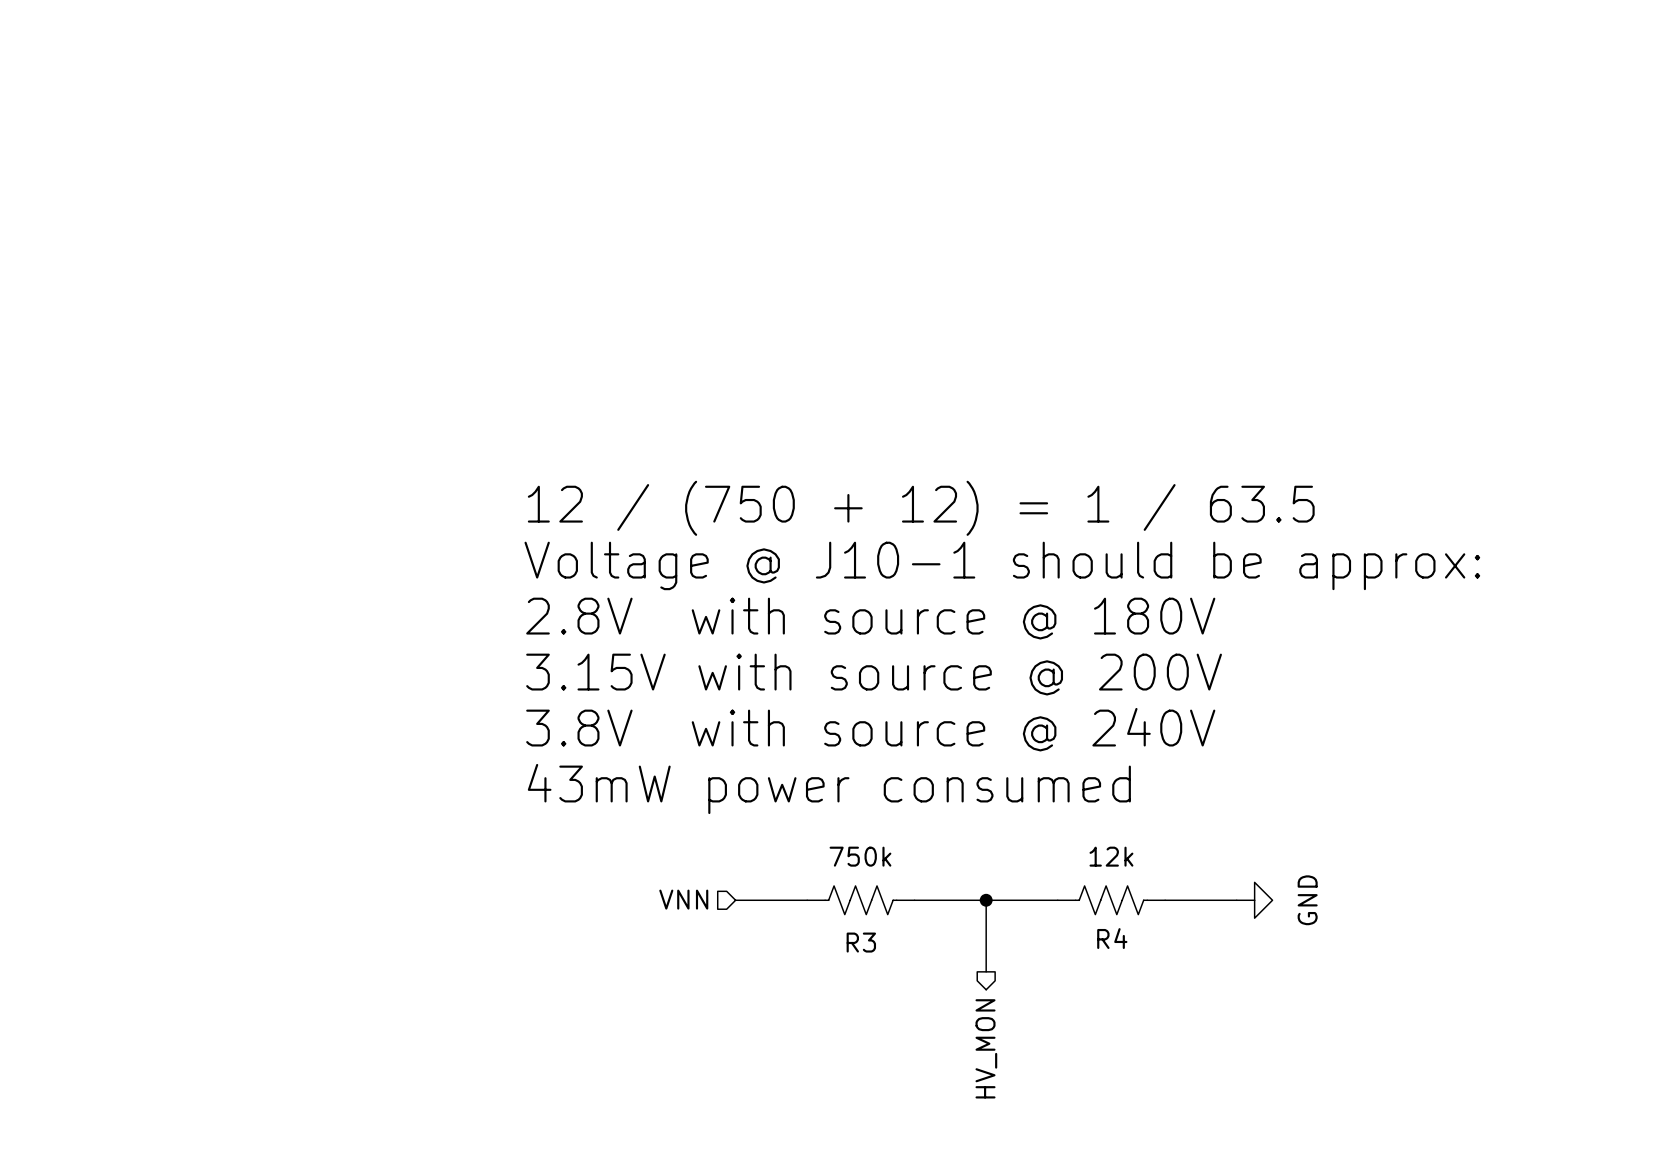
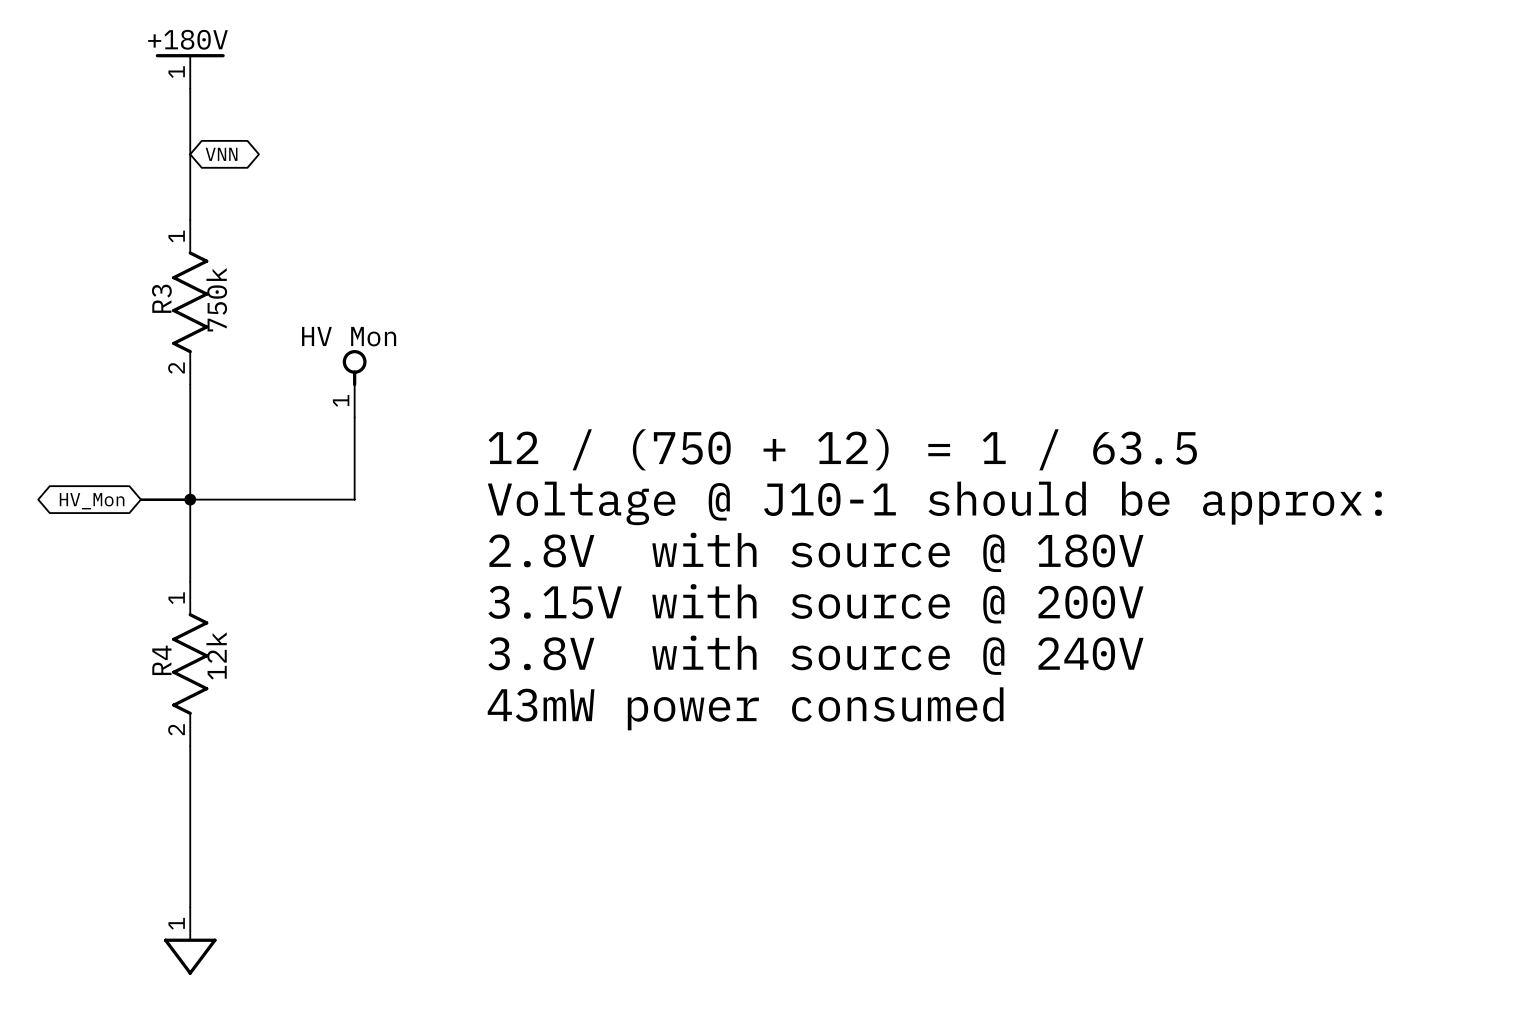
text: none -> +180V (187, 39)
power symbol: none -> (190, 71)
wire: none -> (190, 88) (190, 220)
global label: none -> VNN (221, 154)
text: none -> R3 (161, 298)
text: none -> 750k (216, 299)
part: none -> (190, 302)
text: none -> HV Mon (349, 336)
wire: none -> (190, 384) (190, 581)
power symbol: none -> (354, 383)
wire: none -> (354, 417) (354, 499) (140, 499)
global label: none -> HV_Mon (92, 501)
junction: none -> (190, 499)
text: none -> 12k (216, 655)
text: none -> R4 (161, 660)
part: none -> (190, 664)
wire: none -> (190, 746) (190, 907)
hierarchical label: VNN (683, 899) -> none
wire: (735, 900) (807, 900) -> none
R3: 750k (860, 900) -> none
wire: (914, 900) (1057, 900) -> none
wire: (986, 900) (986, 971) -> none
junction: (986, 900) -> none
R4: 12k (1111, 900) -> none
wire: (1165, 900) (1236, 900) -> none
power symbol: GND (1254, 900) -> none
power symbol: none -> (190, 941)
hierarchical label: HV_MON (986, 1048) -> none

